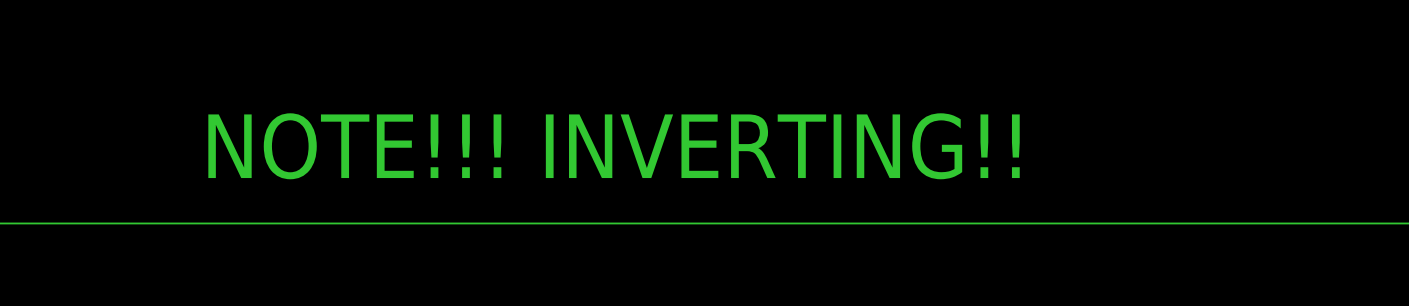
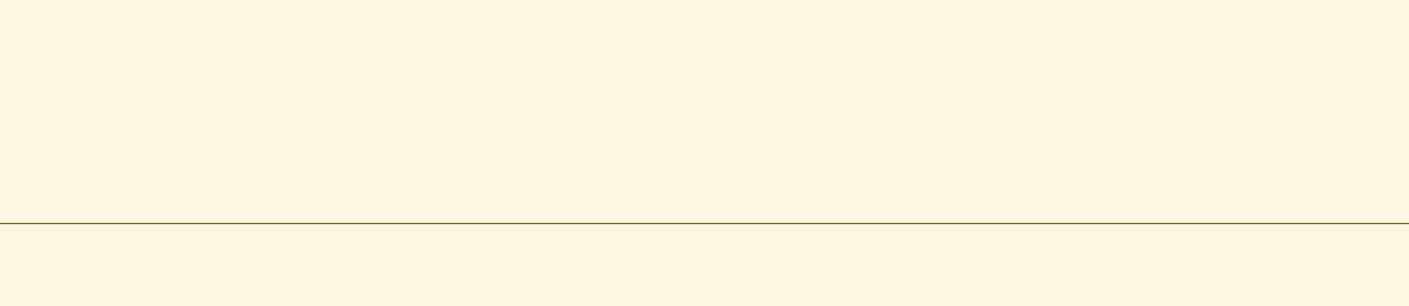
text: NOTE!!! INVERTING!! (614, 146) -> none

